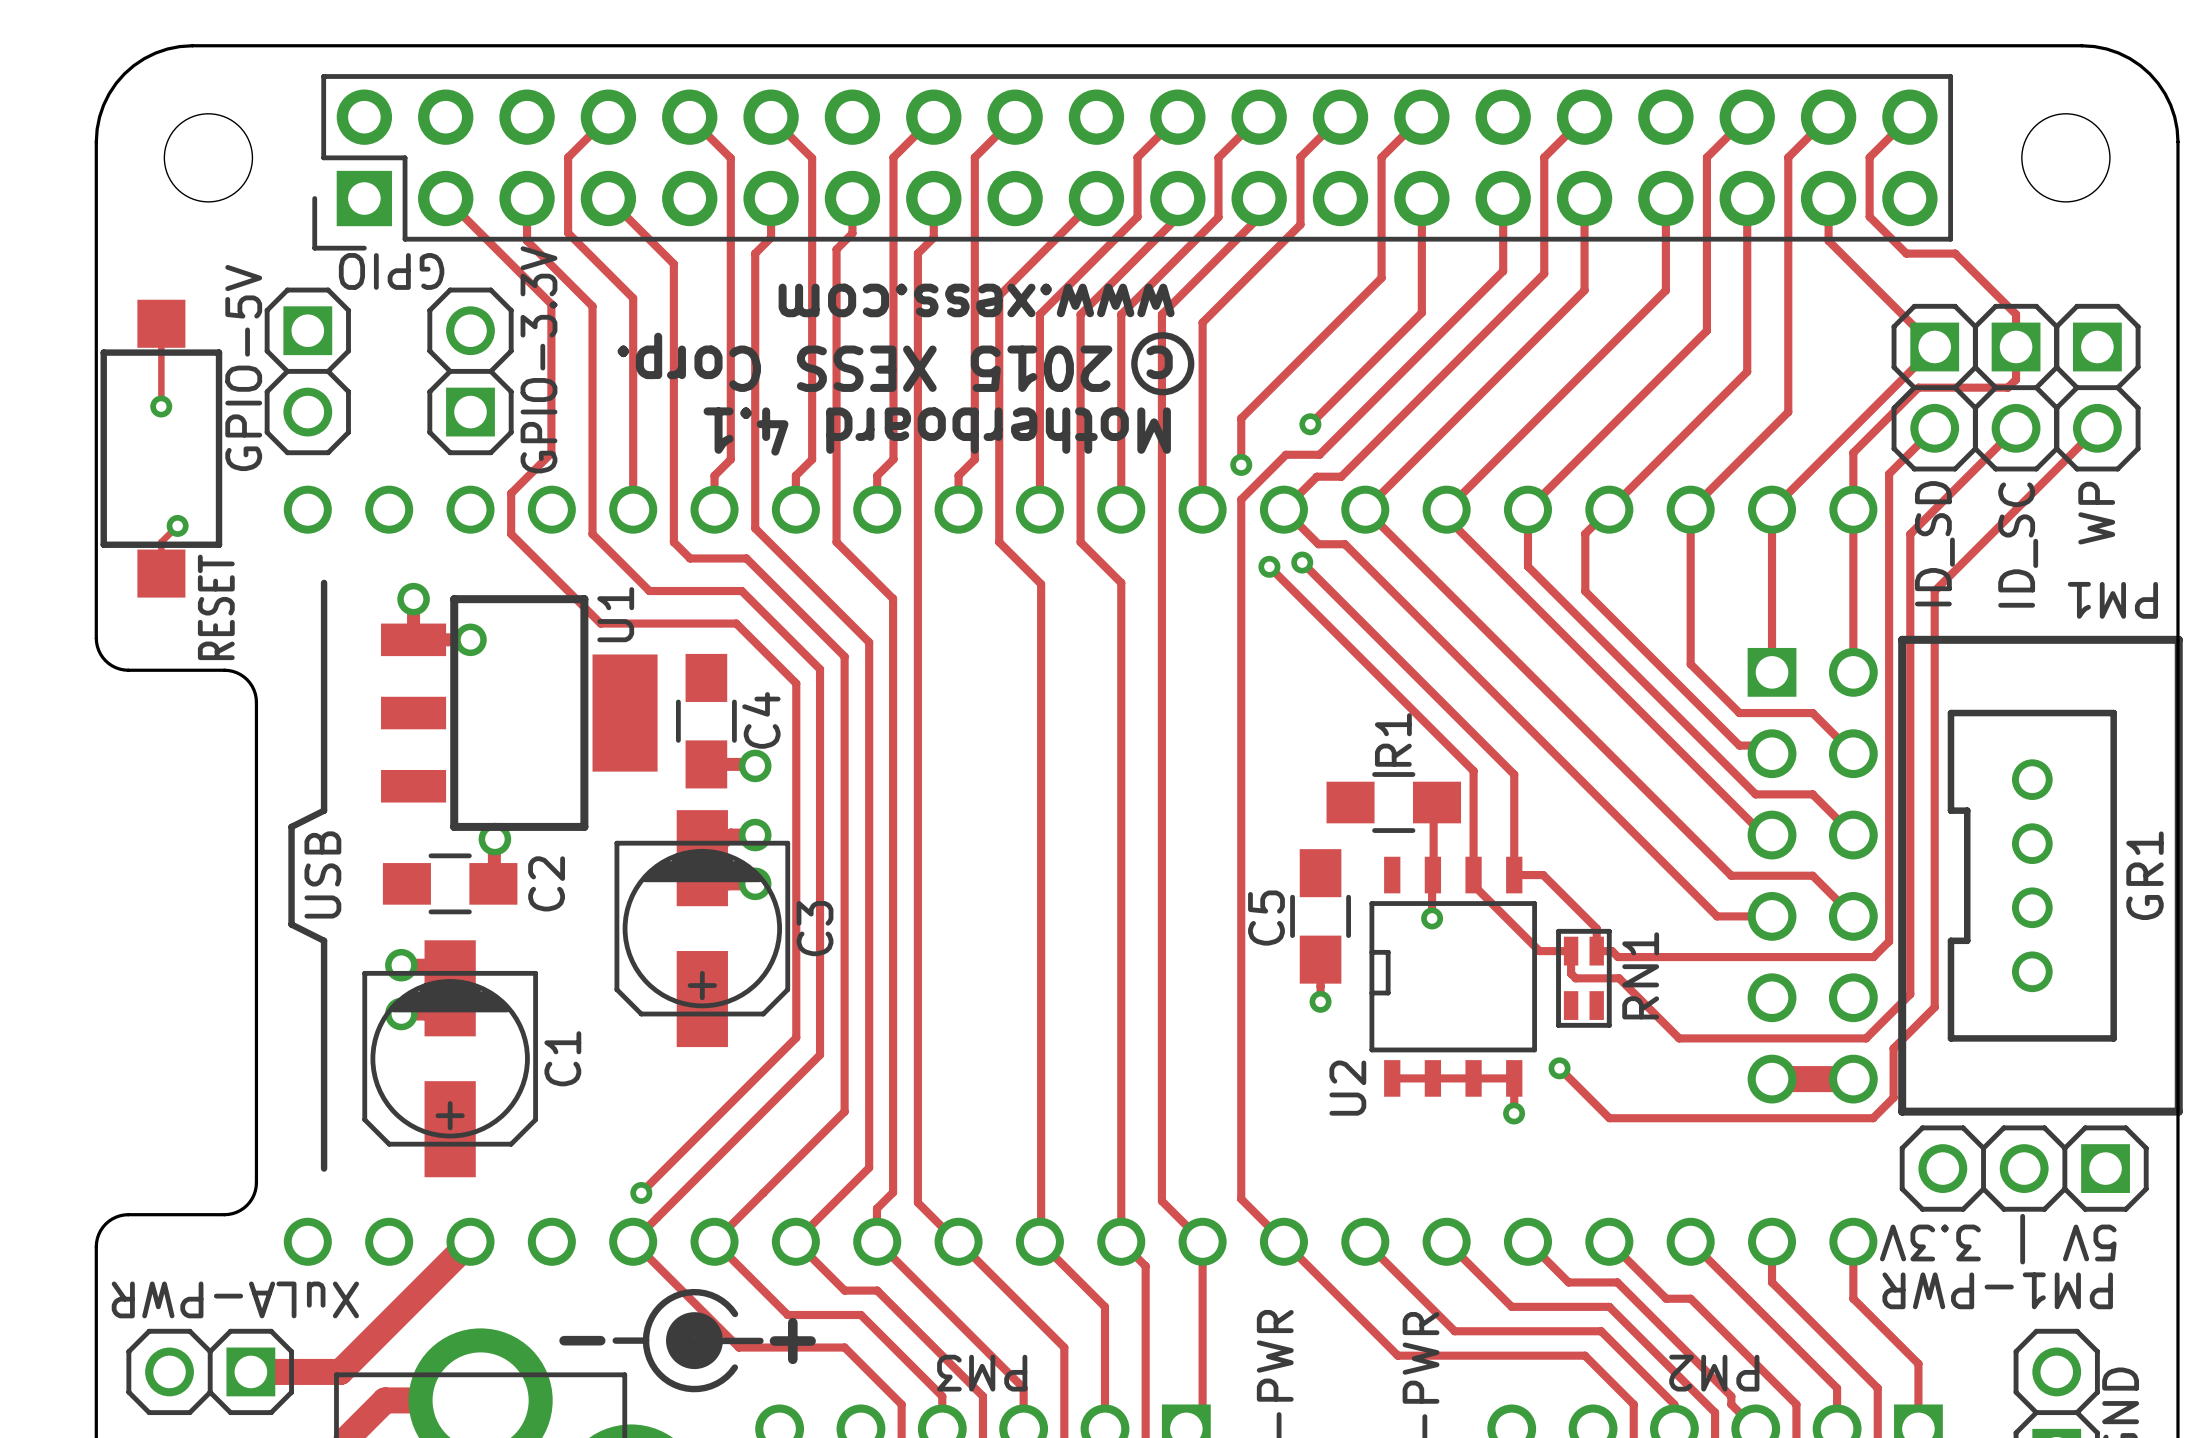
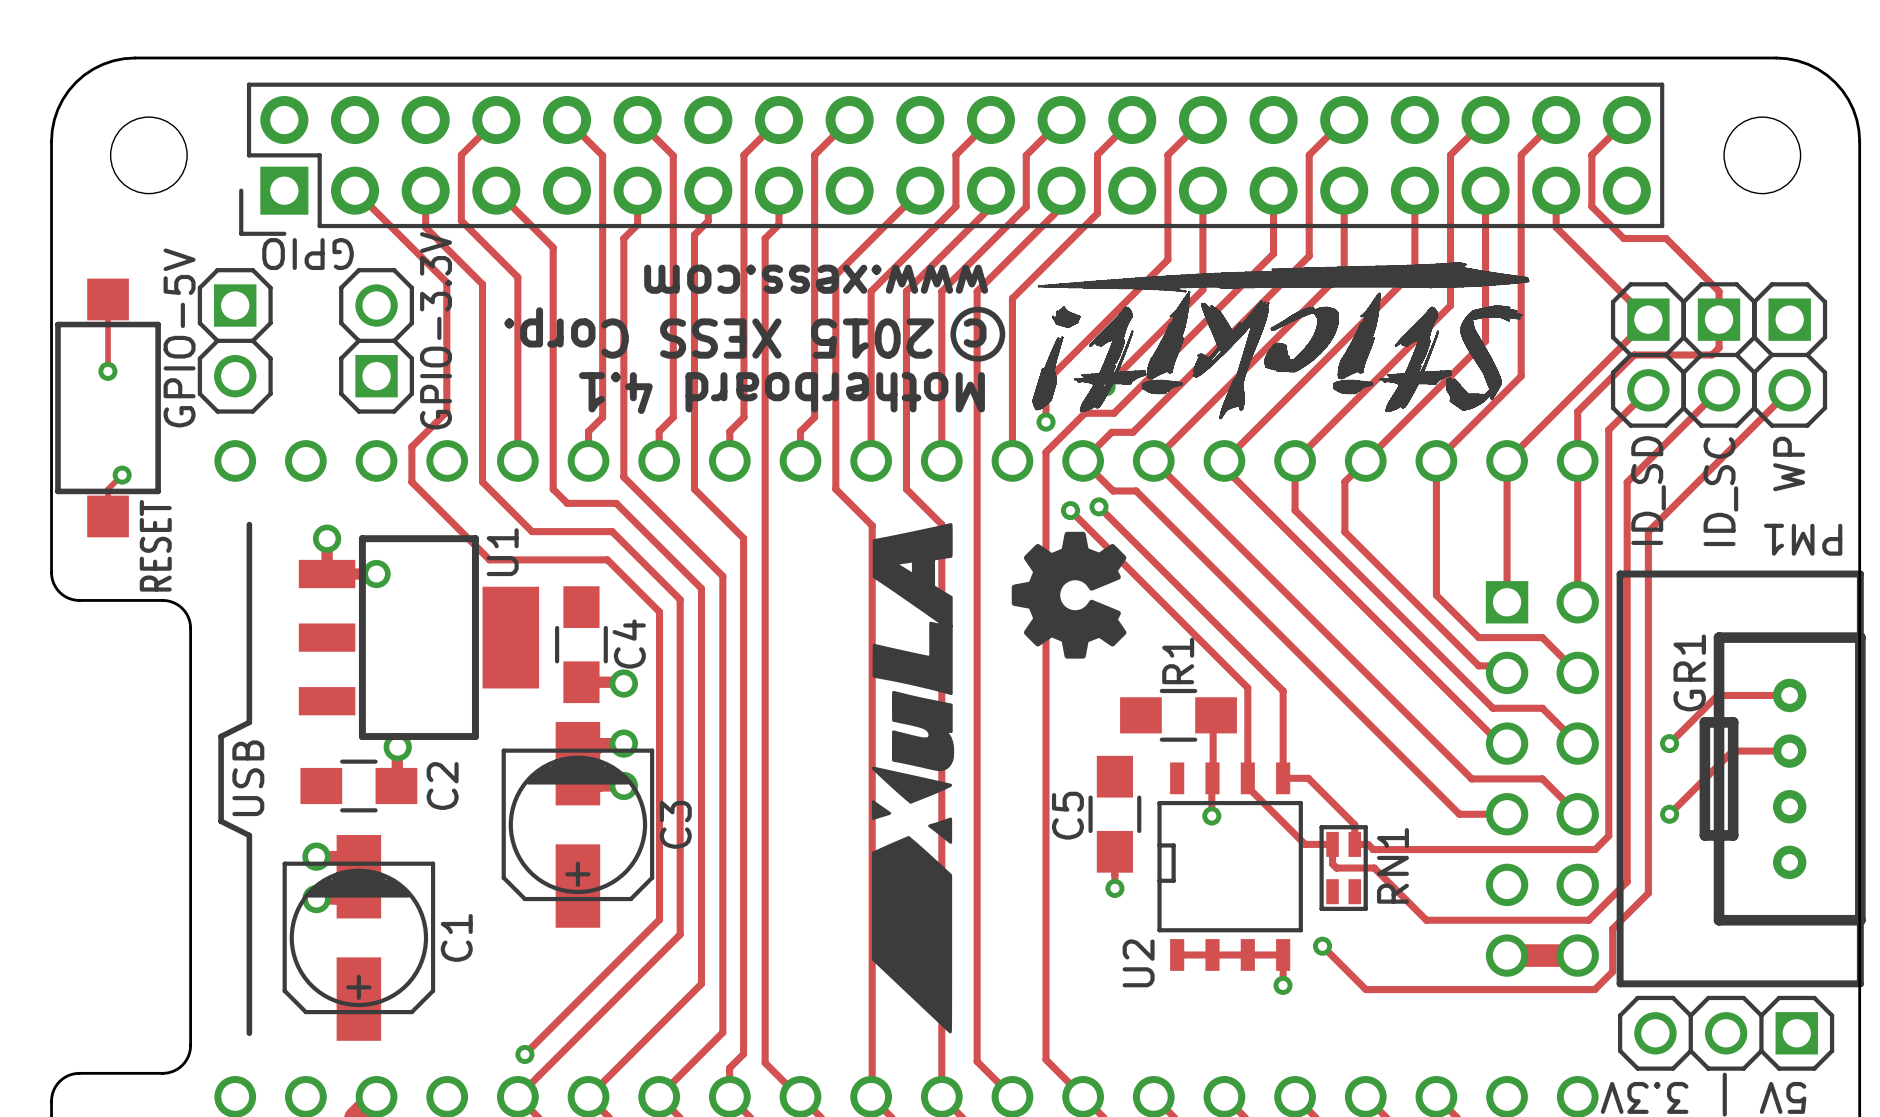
drawing: none -> [1032, 262, 1530, 420]
drawing: none -> [871, 523, 955, 1034]
drawing: none -> [1011, 531, 1127, 659]
GR1 footprint: [1947, 709, 2117, 1042] -> [1699, 632, 1866, 926]
track: none -> (1789, 695) (1717, 695) (1669, 743)
via: none -> (1669, 743)
track: none -> (1789, 751) (1732, 751) (1669, 814)
GR1 name position: GR1 (2144, 875) -> GR1 (1689, 672)
via: none -> (1669, 814)

